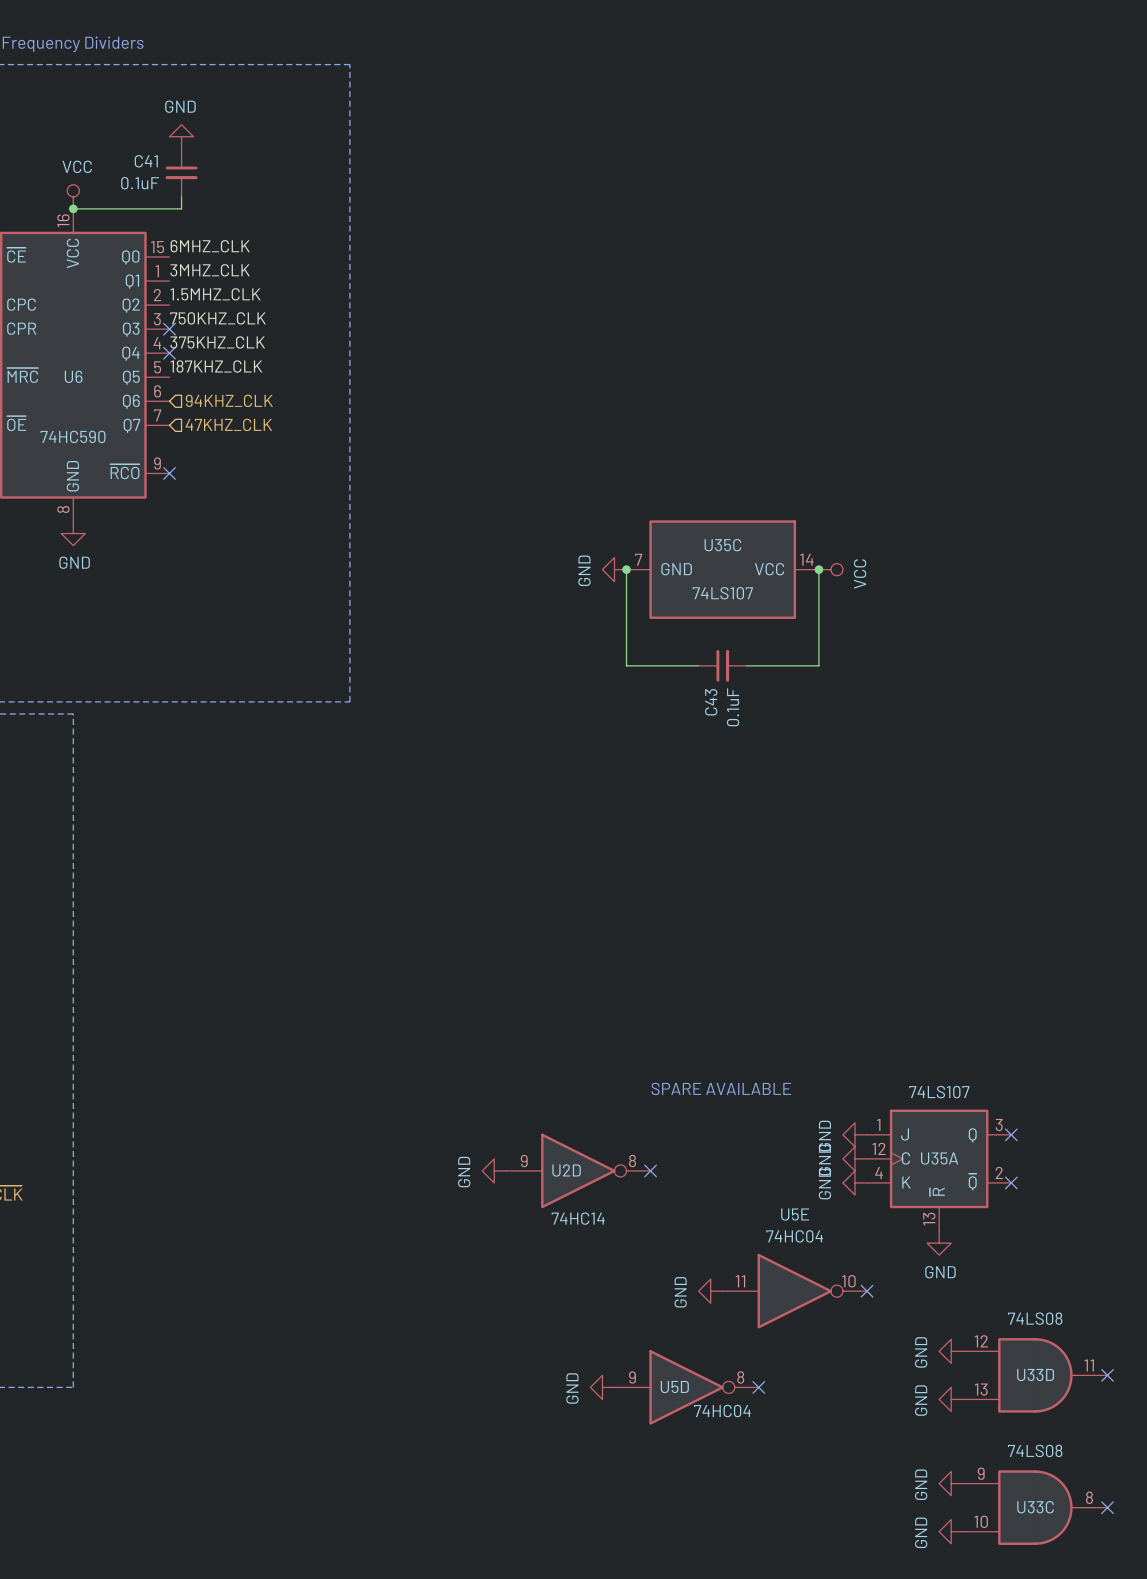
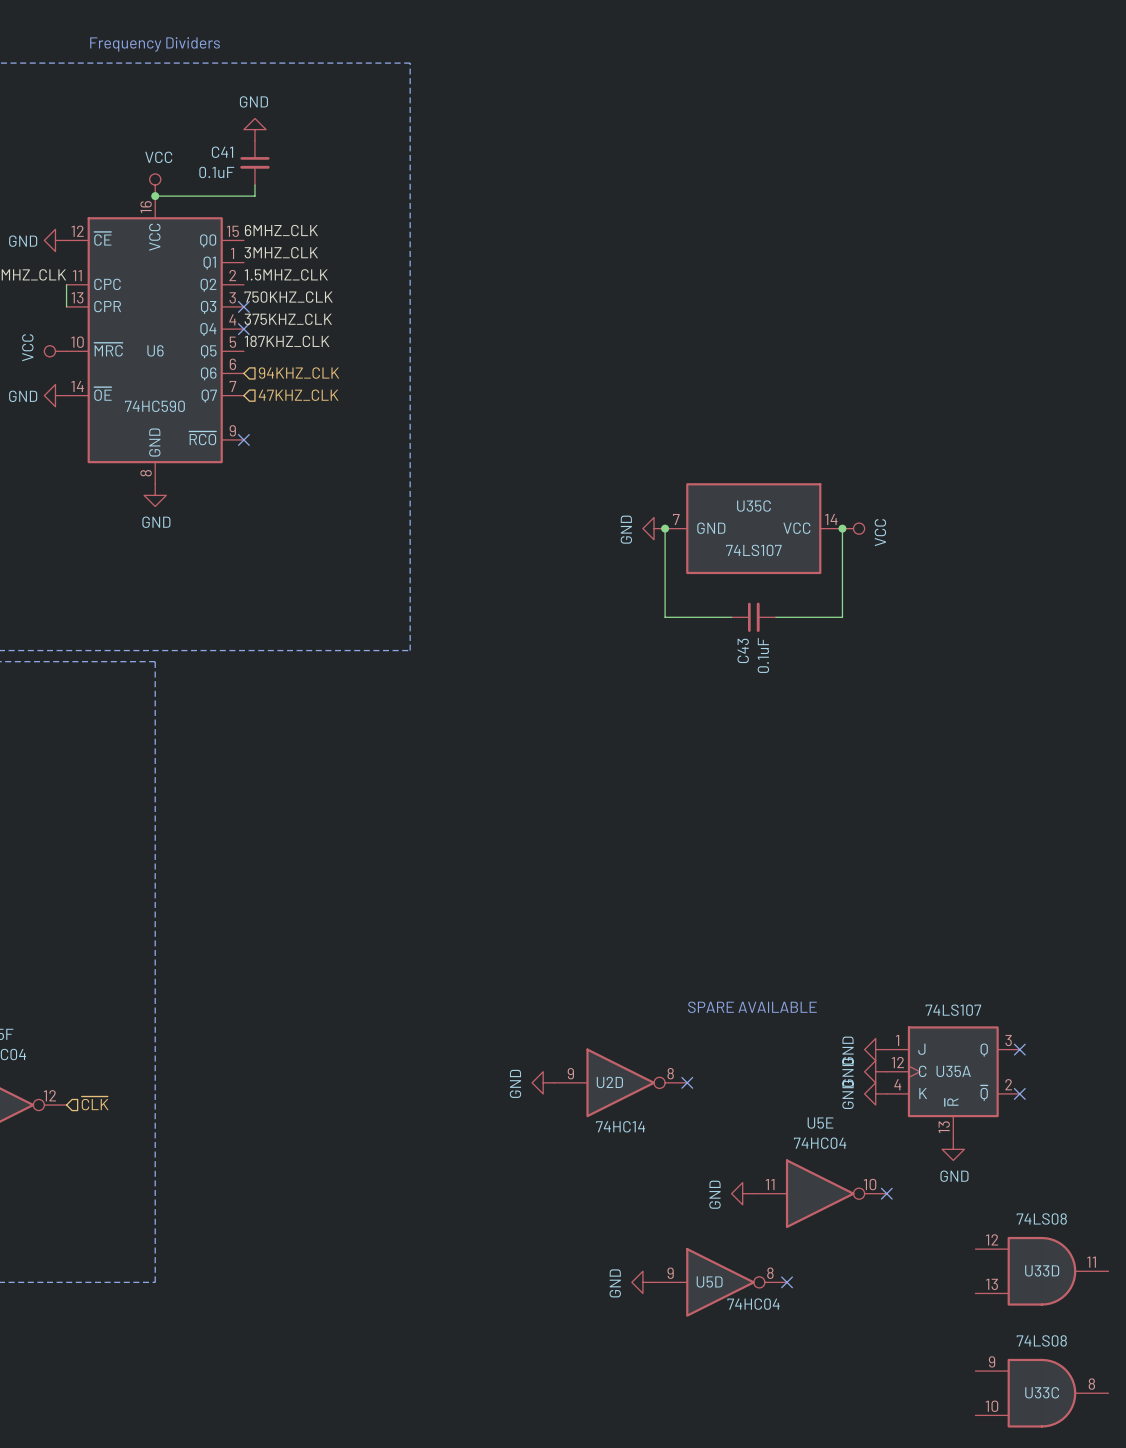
power symbol: GND (951, 1351) -> none
no-connect mark: (1107, 1375) -> none
power symbol: GND (951, 1399) -> none
power symbol: GND (951, 1483) -> none
no-connect mark: (1107, 1507) -> none
power symbol: GND (951, 1531) -> none

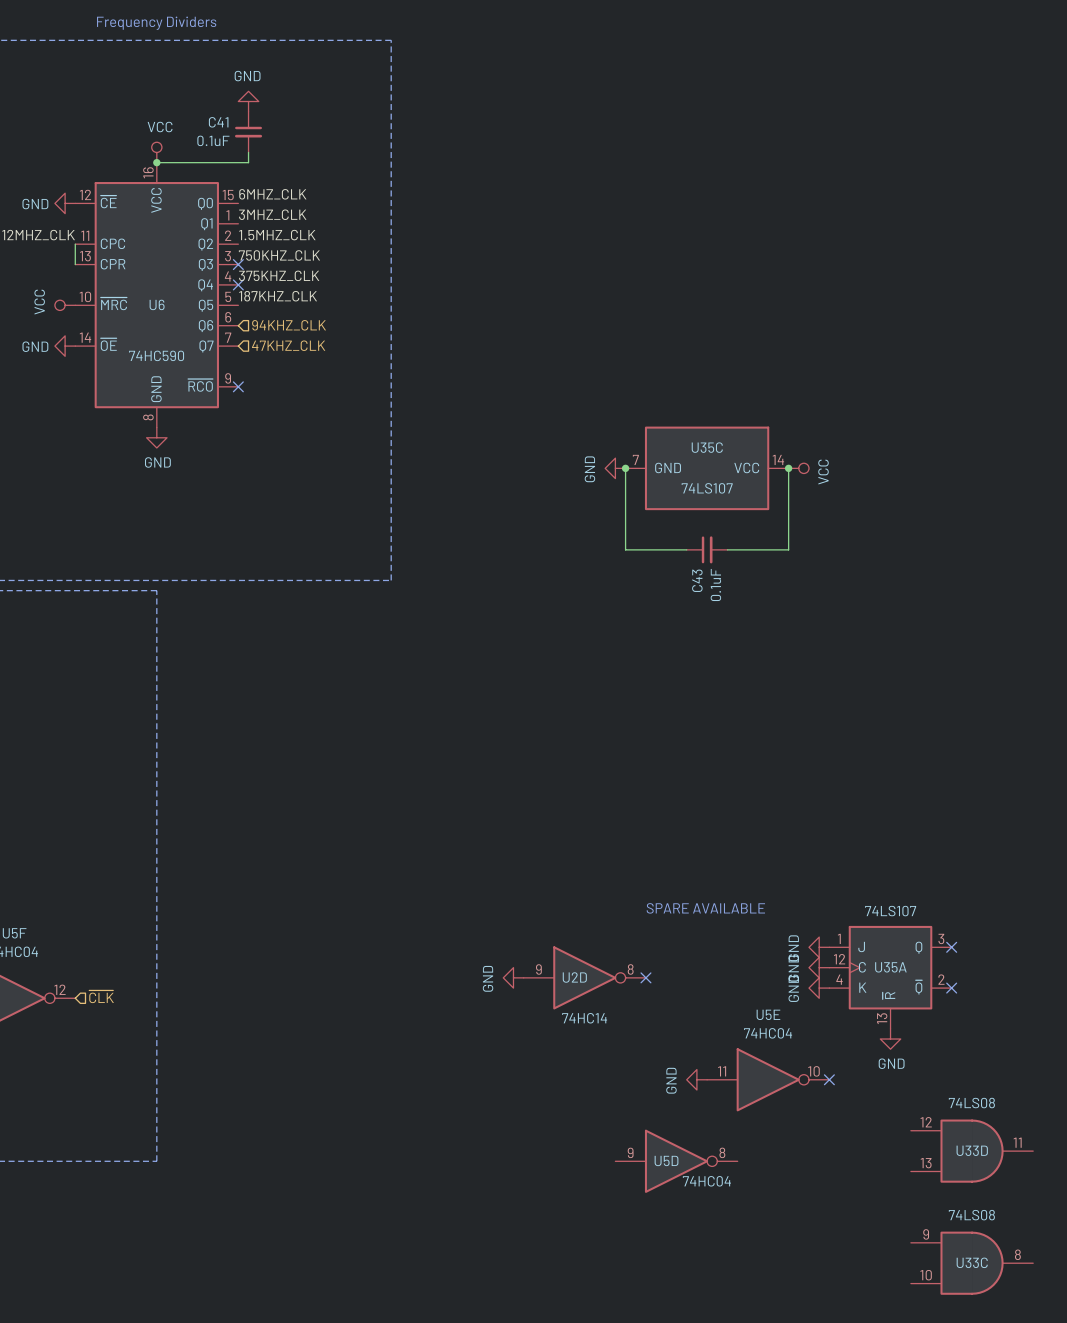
power symbol: GND (642, 1282) -> none
no-connect mark: (787, 1282) -> none

